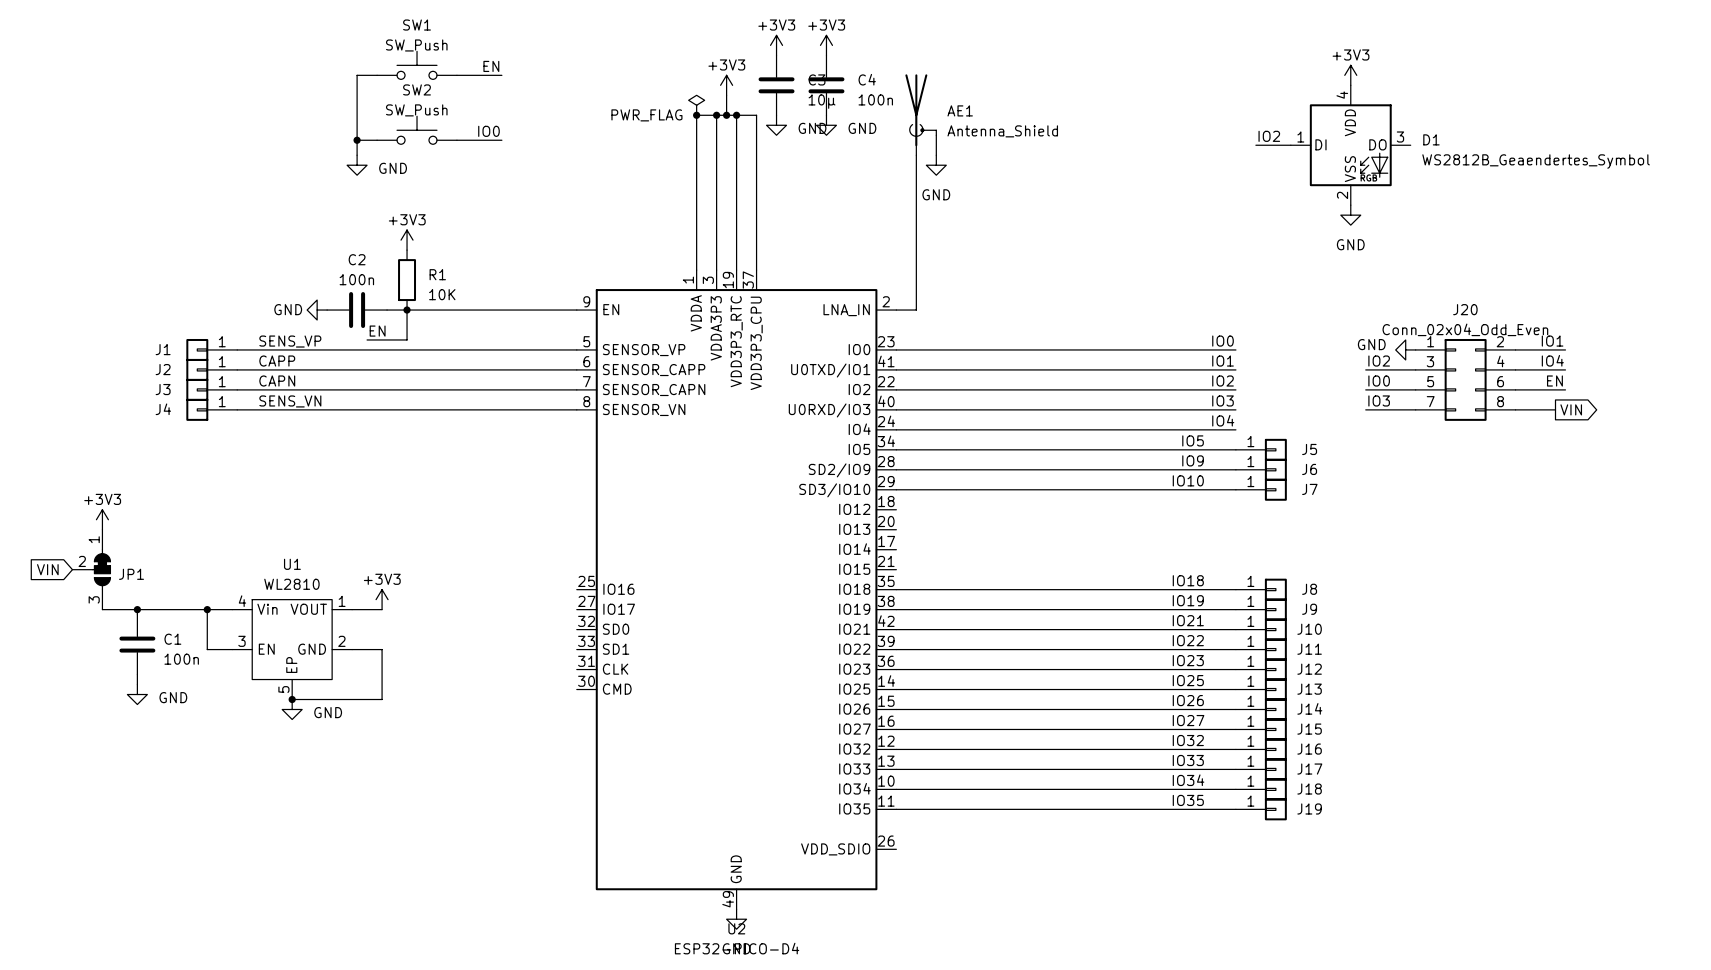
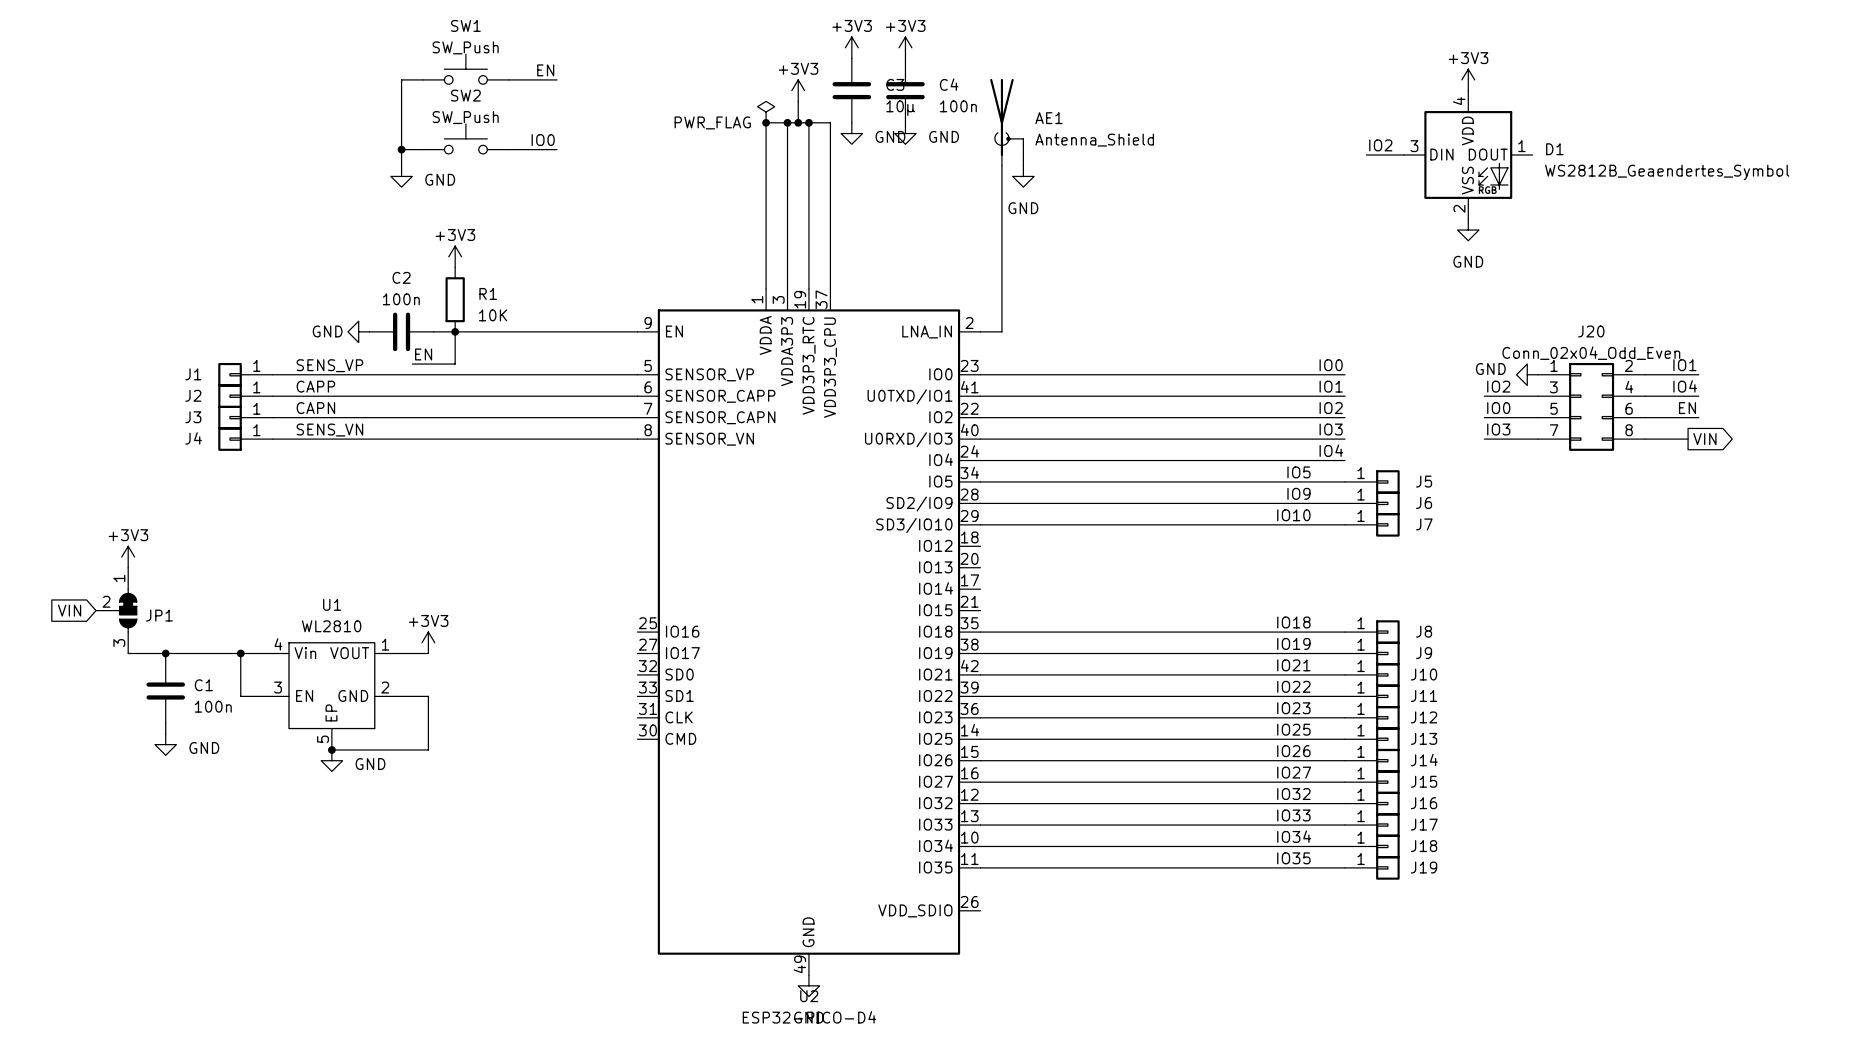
D1 pin number: 1 (1300, 137) -> 3 (1414, 146)
D1 pin number: 3 (1400, 137) -> 1 (1521, 146)
D1 pin name: DI (1320, 144) -> DIN (1441, 154)
D1 pin name: DO (1377, 144) -> DOUT (1488, 154)

